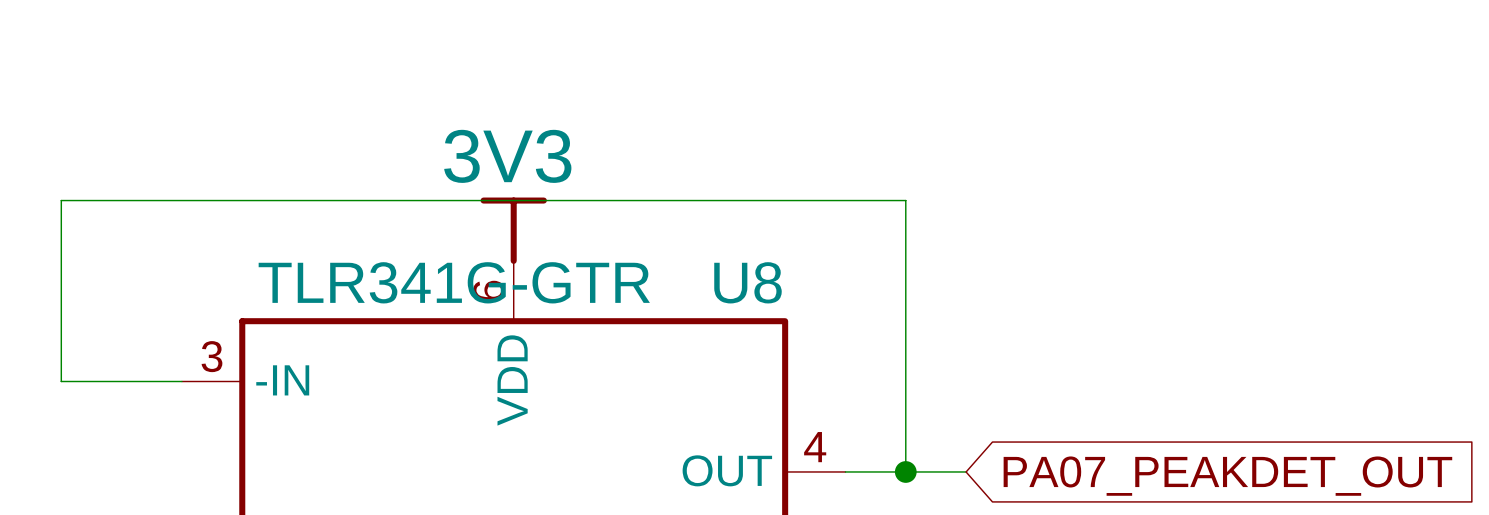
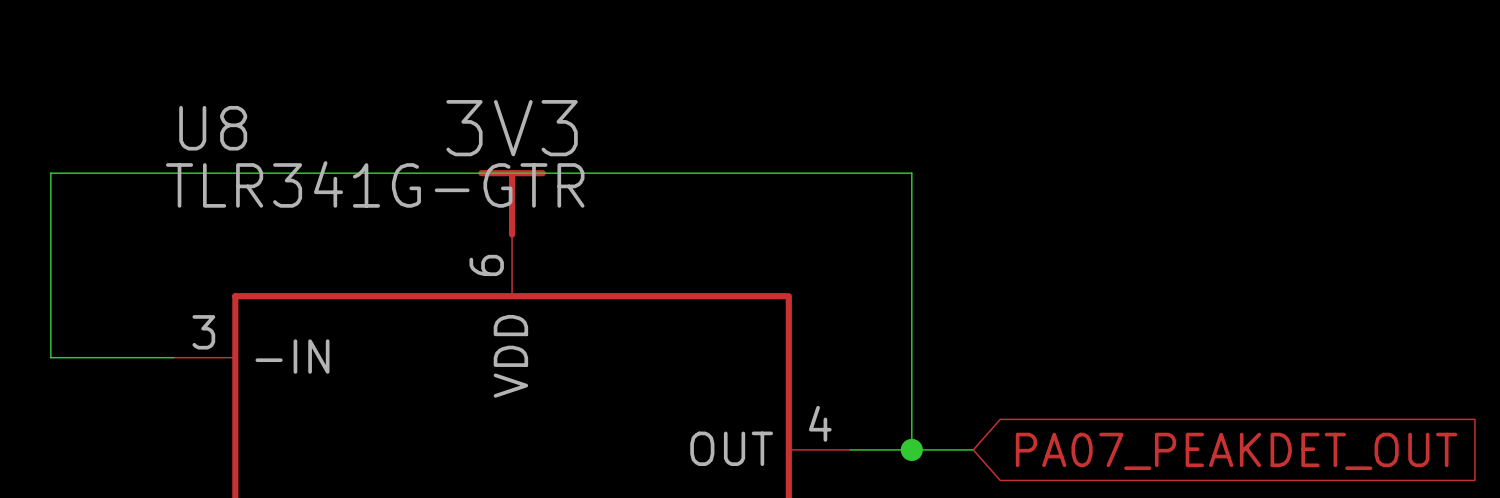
U8 value position: TLR341G-GTR (454, 282) -> TLR341G-GTR (375, 184)
U8 name position: U8 (747, 282) -> U8 (213, 128)

